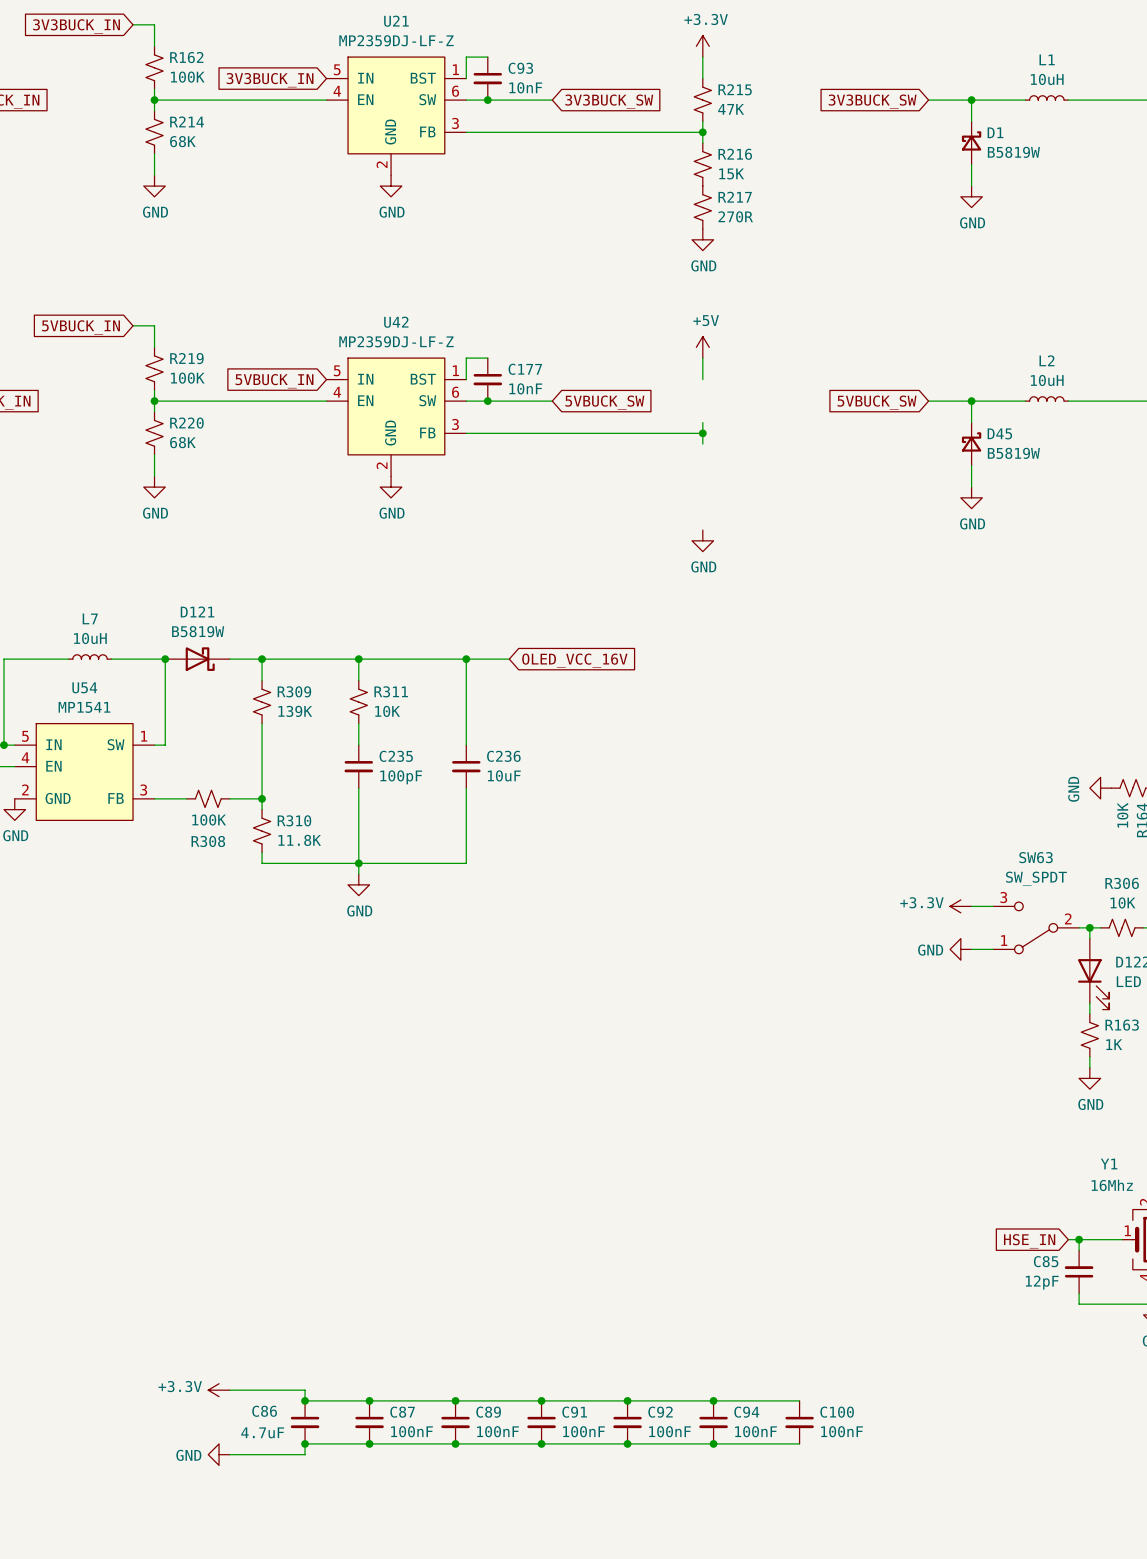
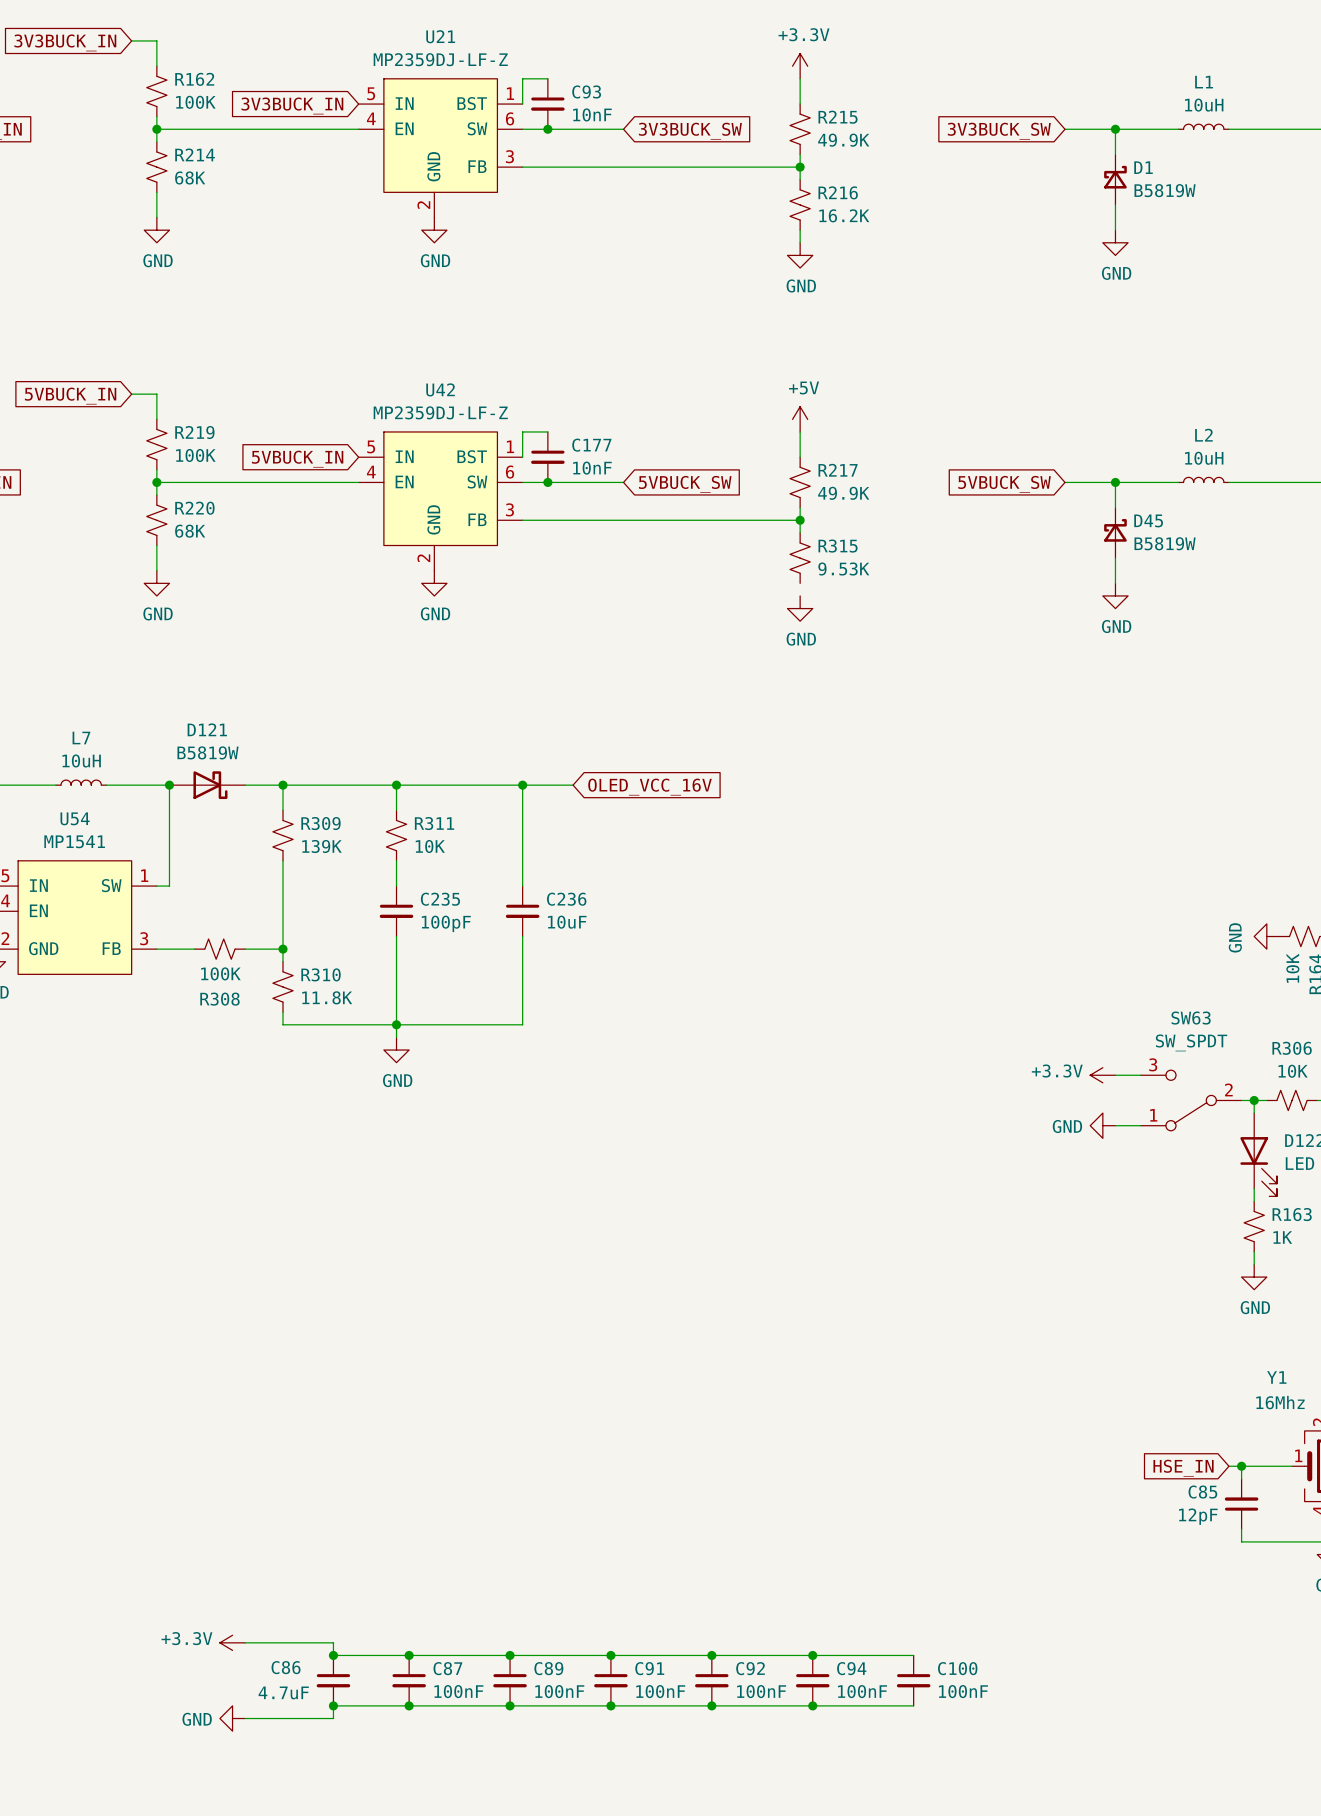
R215 value: 47K (731, 109) -> 49.9K (843, 140)
R216 value: 15K (731, 173) -> 16.2K (844, 215)
R217 position: (702, 207) -> (800, 482)
R217 value: 270R (735, 216) -> 49.9K (843, 493)
power symbol position: GND (702, 239) -> GND (800, 255)
R315: none -> 9.53K (800, 558)
power symbol position: GND (702, 540) -> GND (800, 608)

